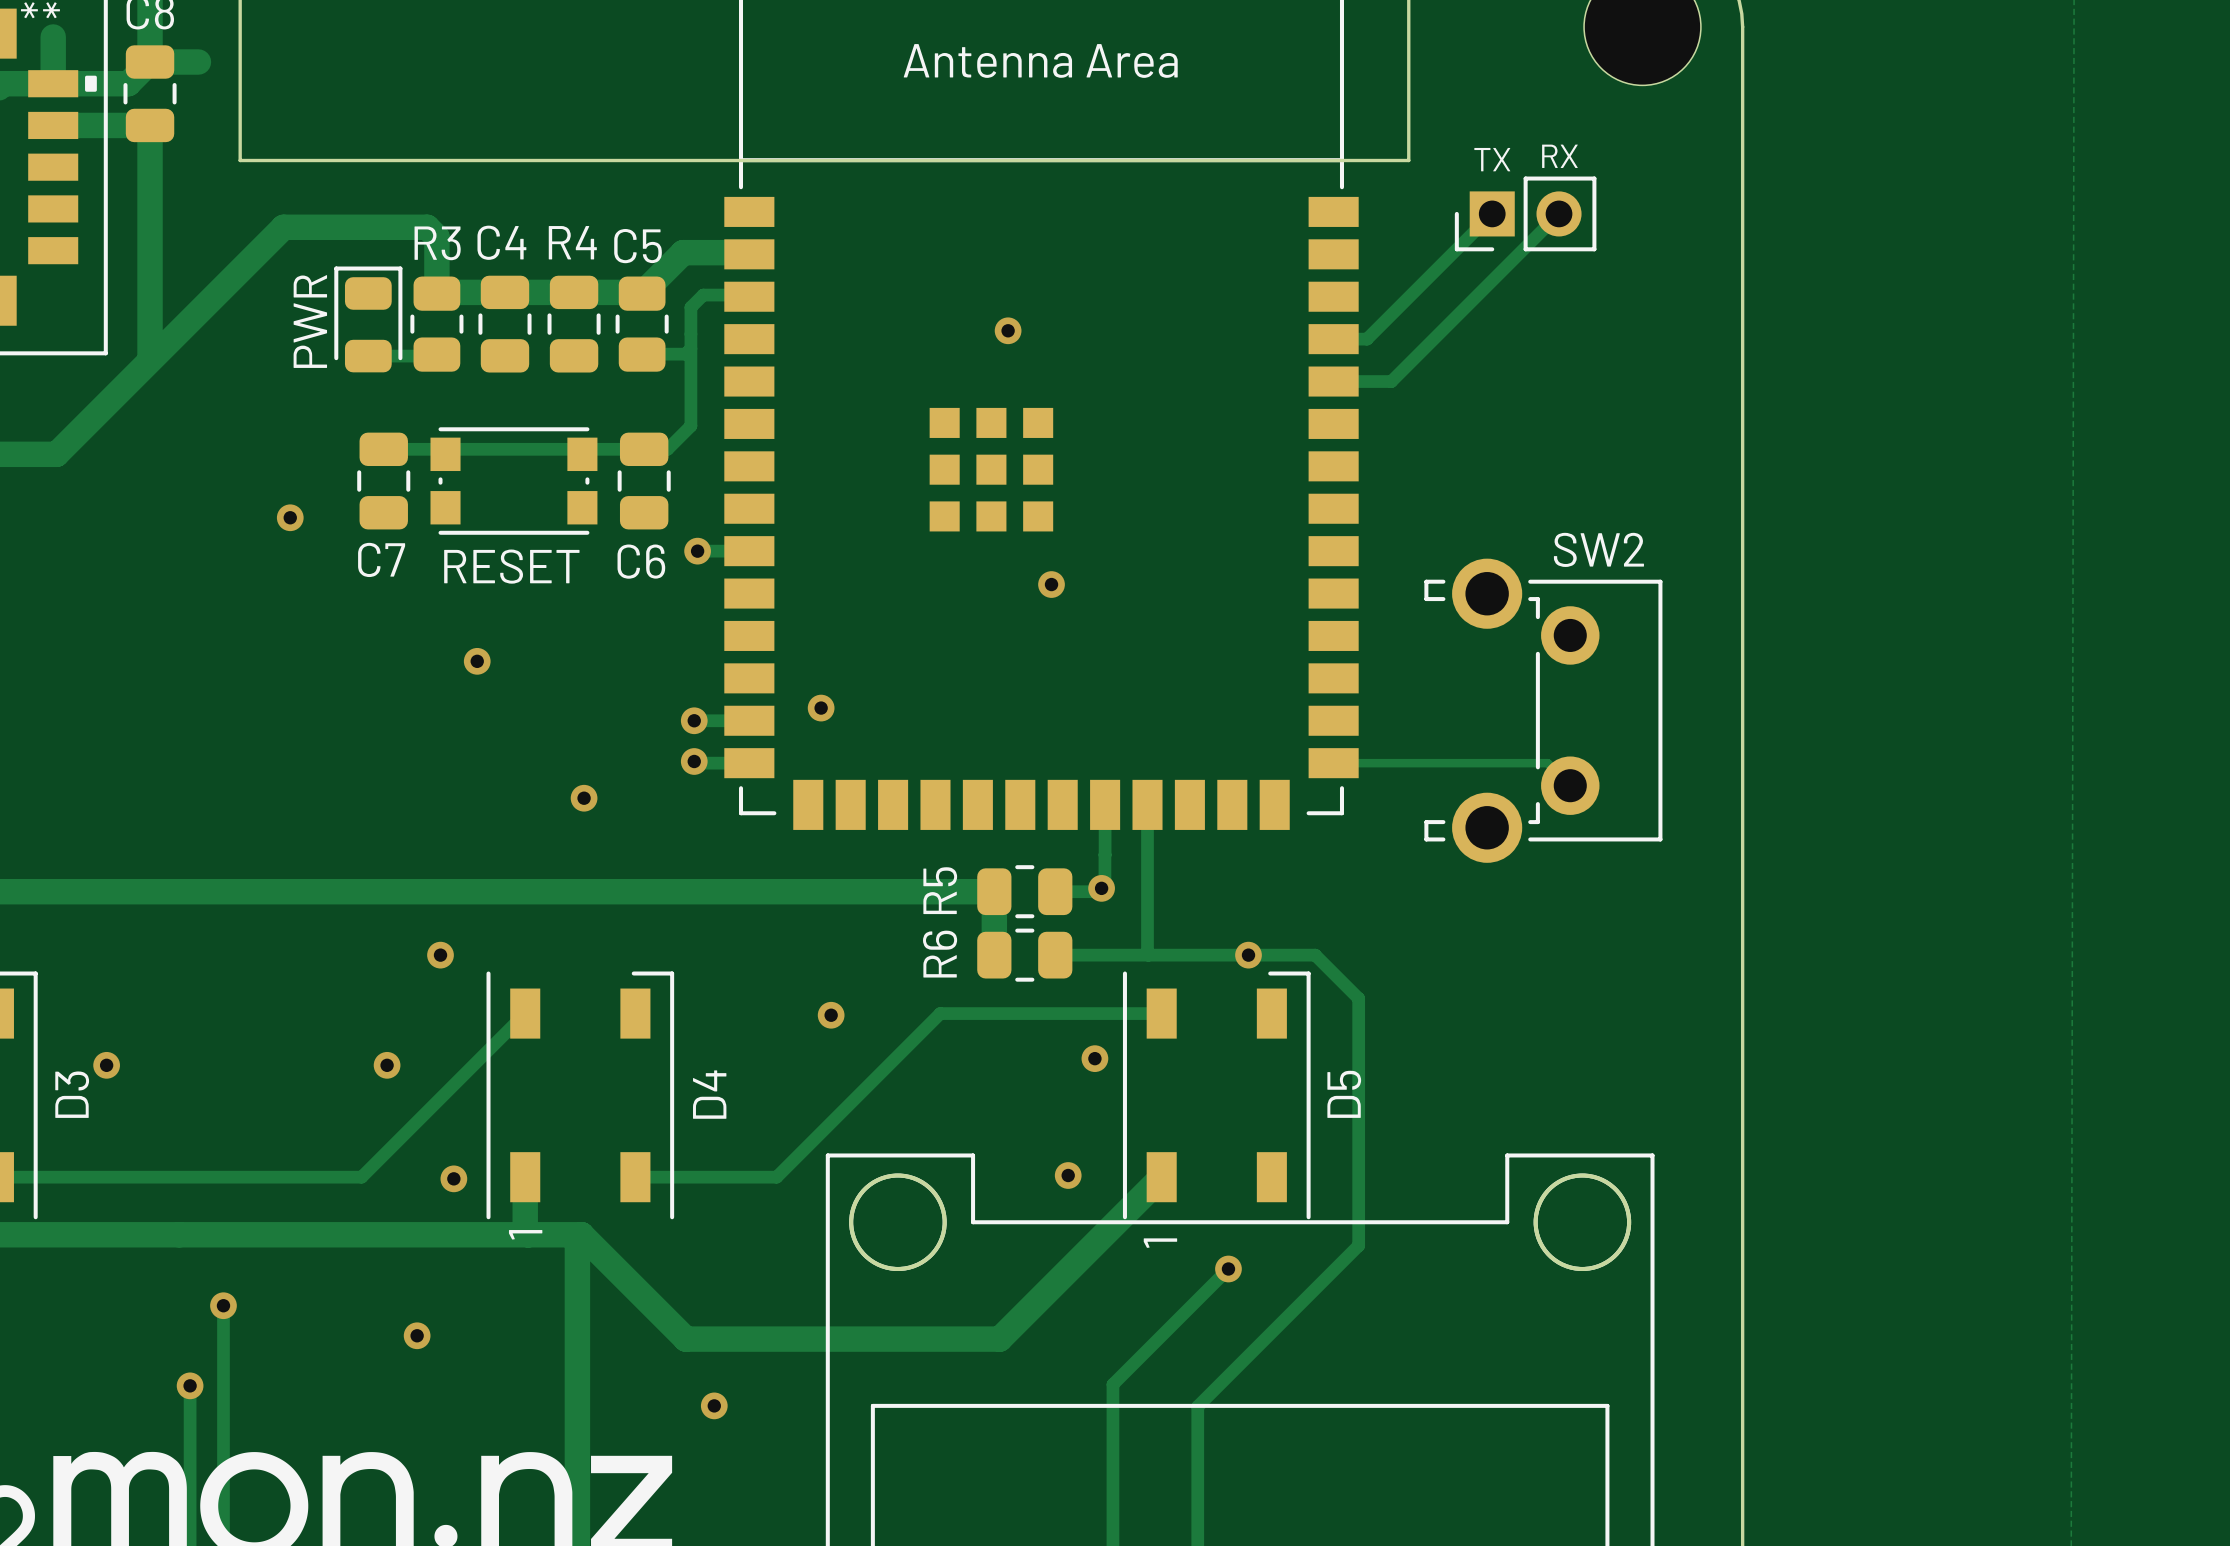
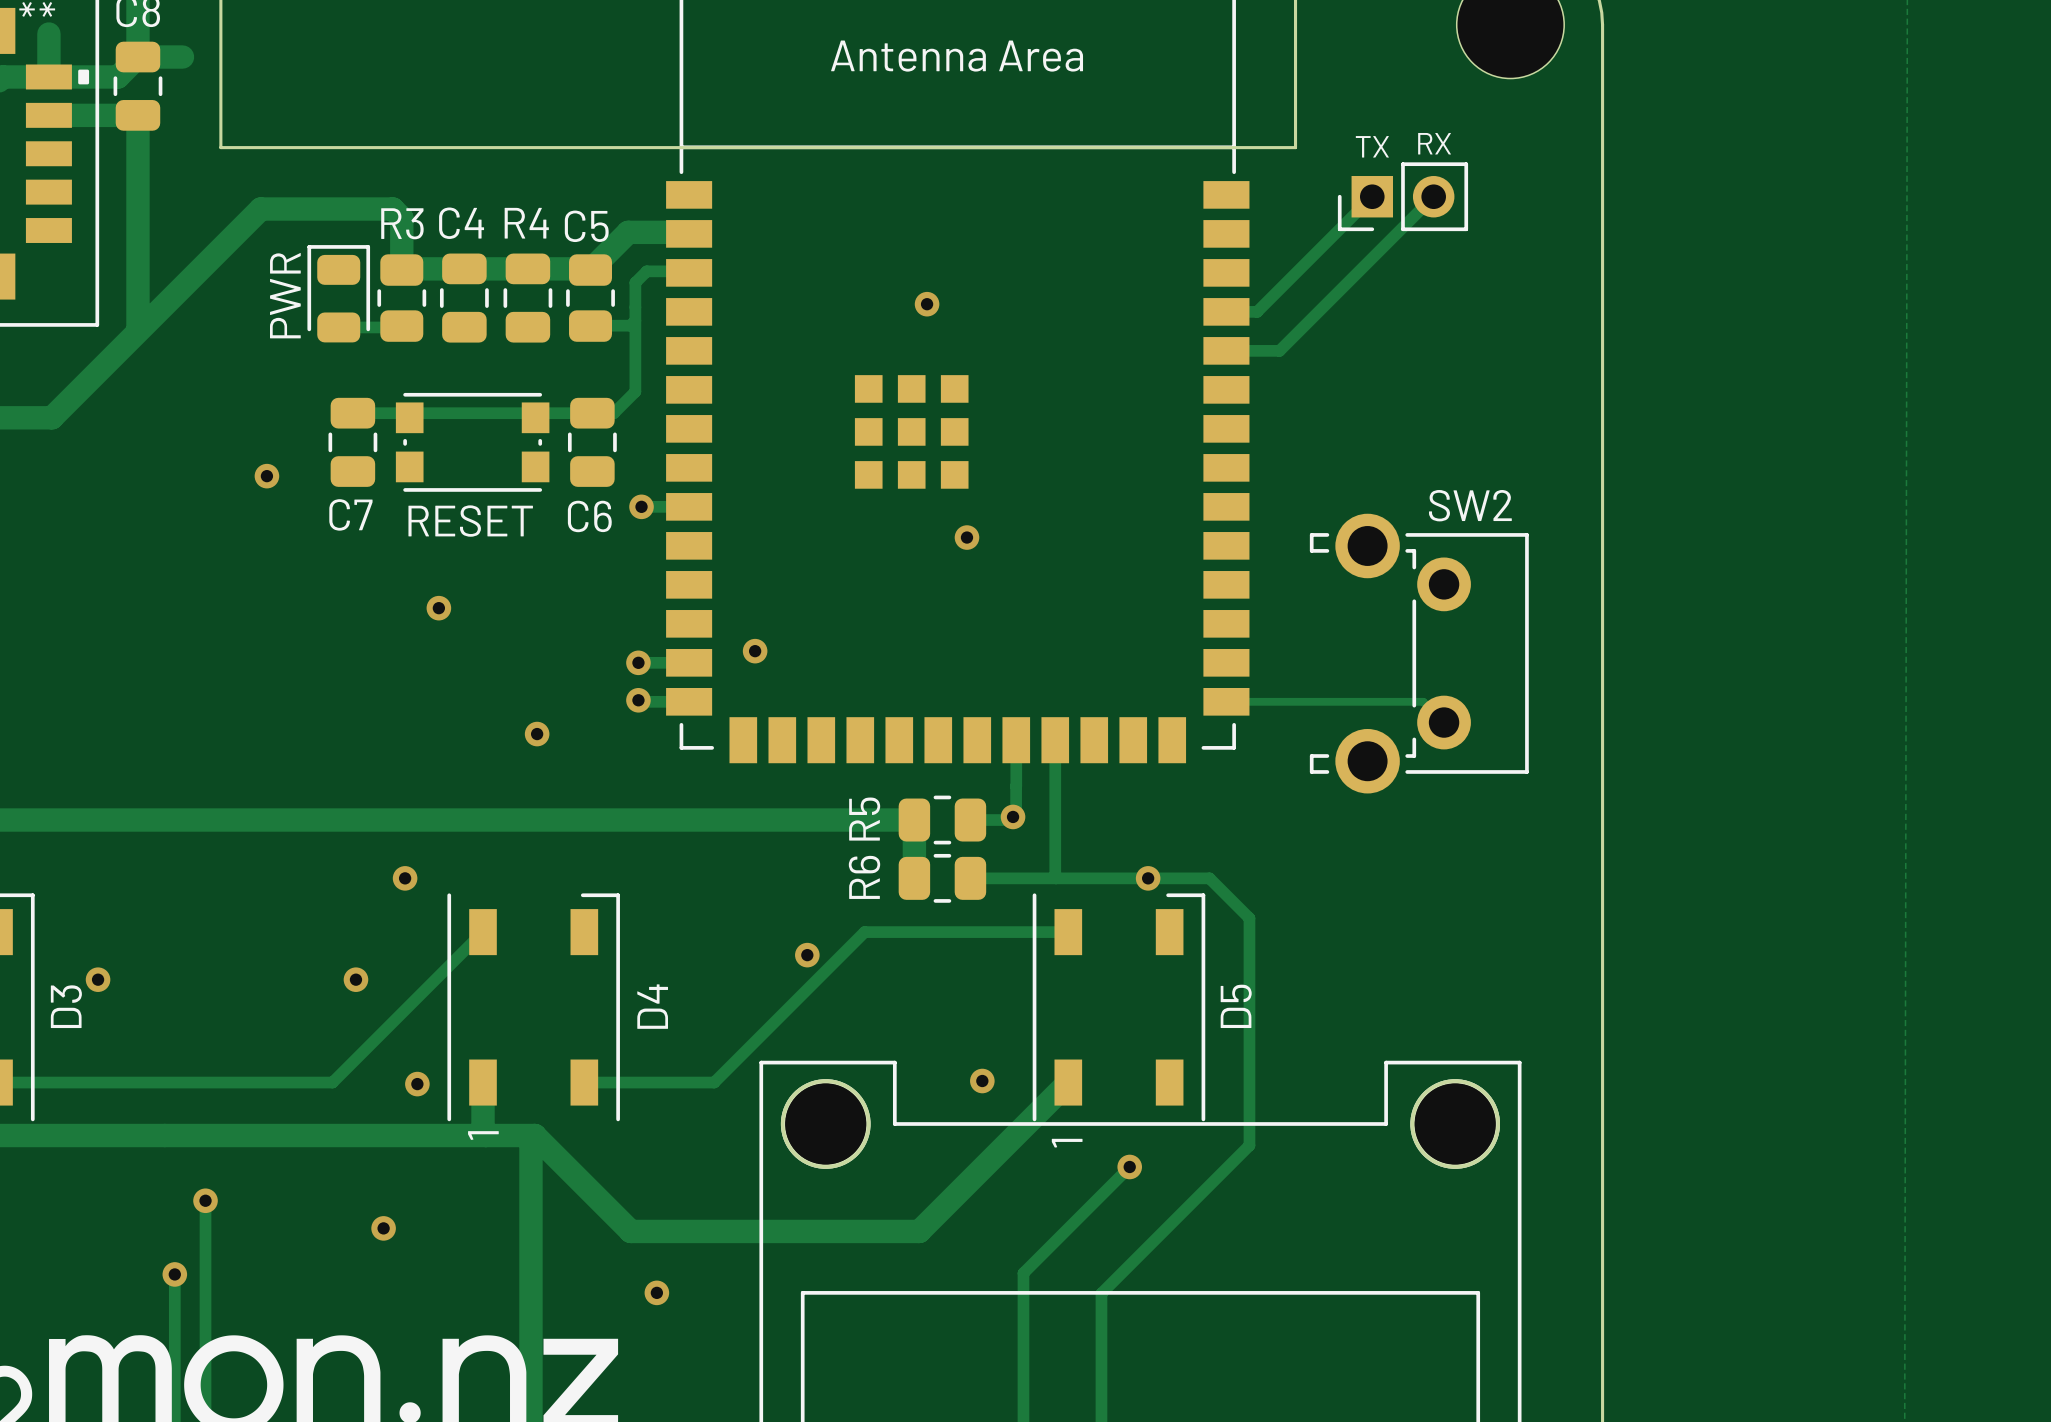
via position: (831, 1015) -> (807, 955)
via: (1094, 1058) -> none
part: none -> (825, 1124)
part: none -> (1455, 1124)

